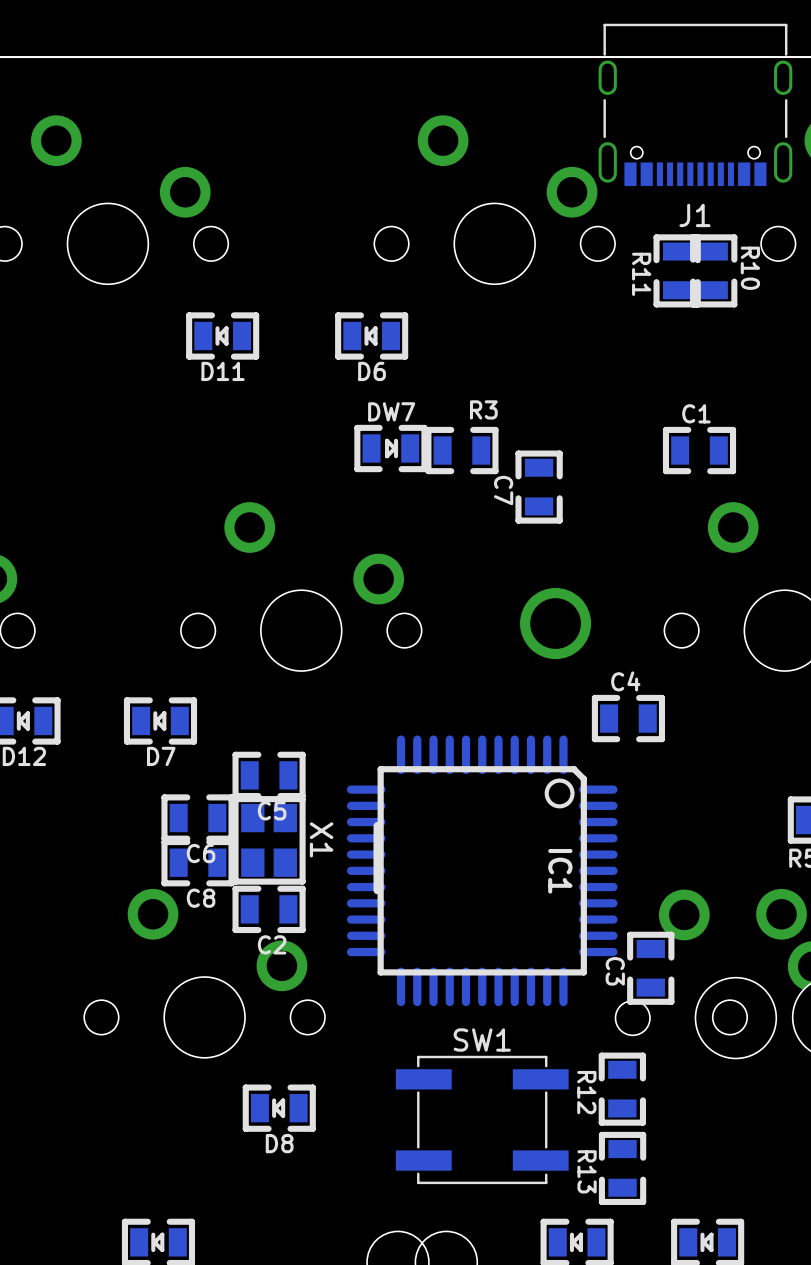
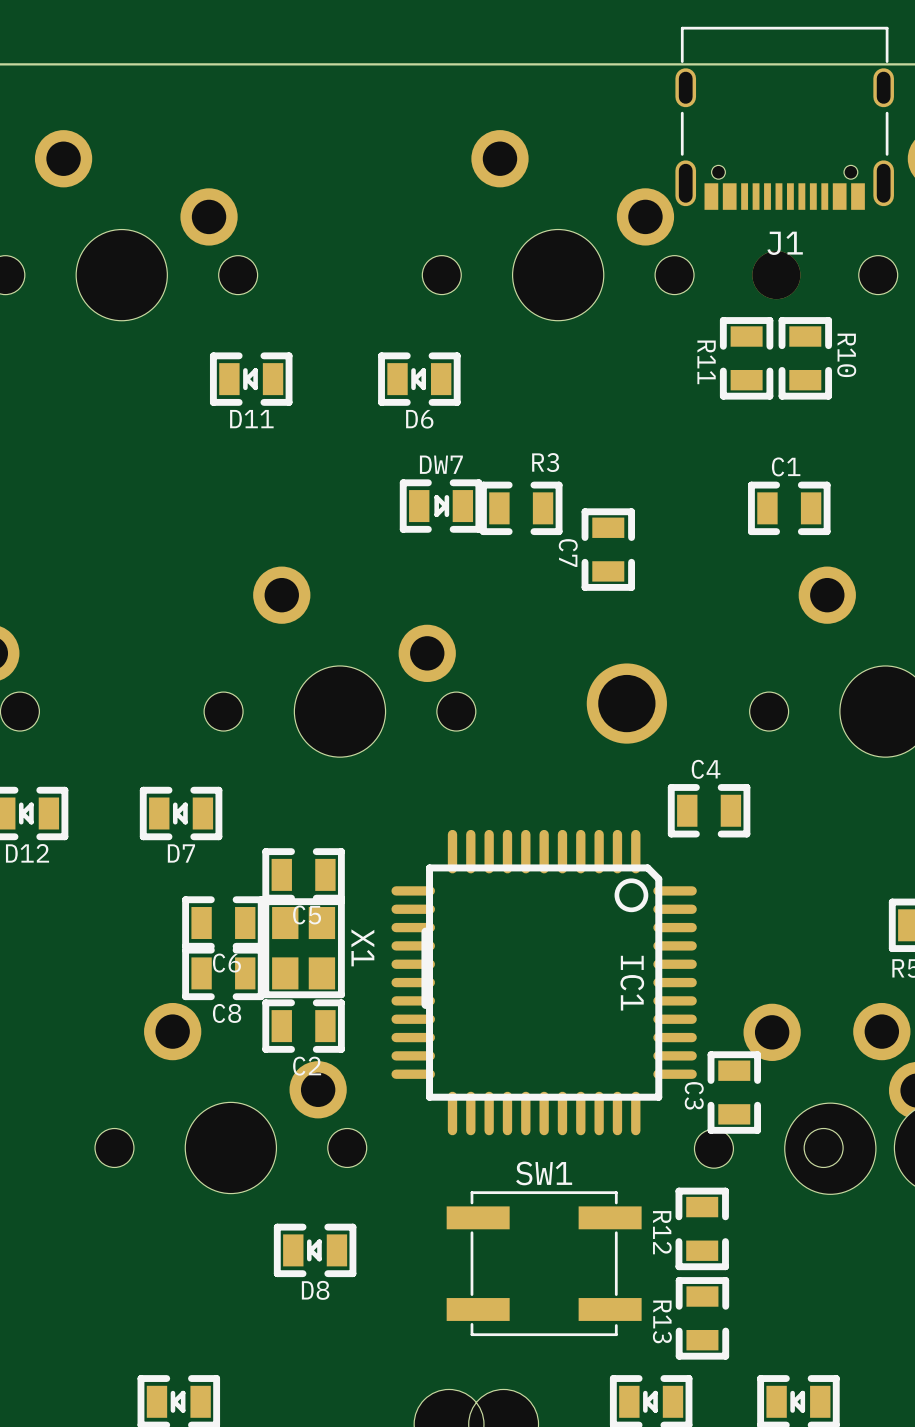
part: none -> (776, 275)
R11 position: (677, 270) -> (746, 358)
R10 position: (713, 270) -> (805, 358)

